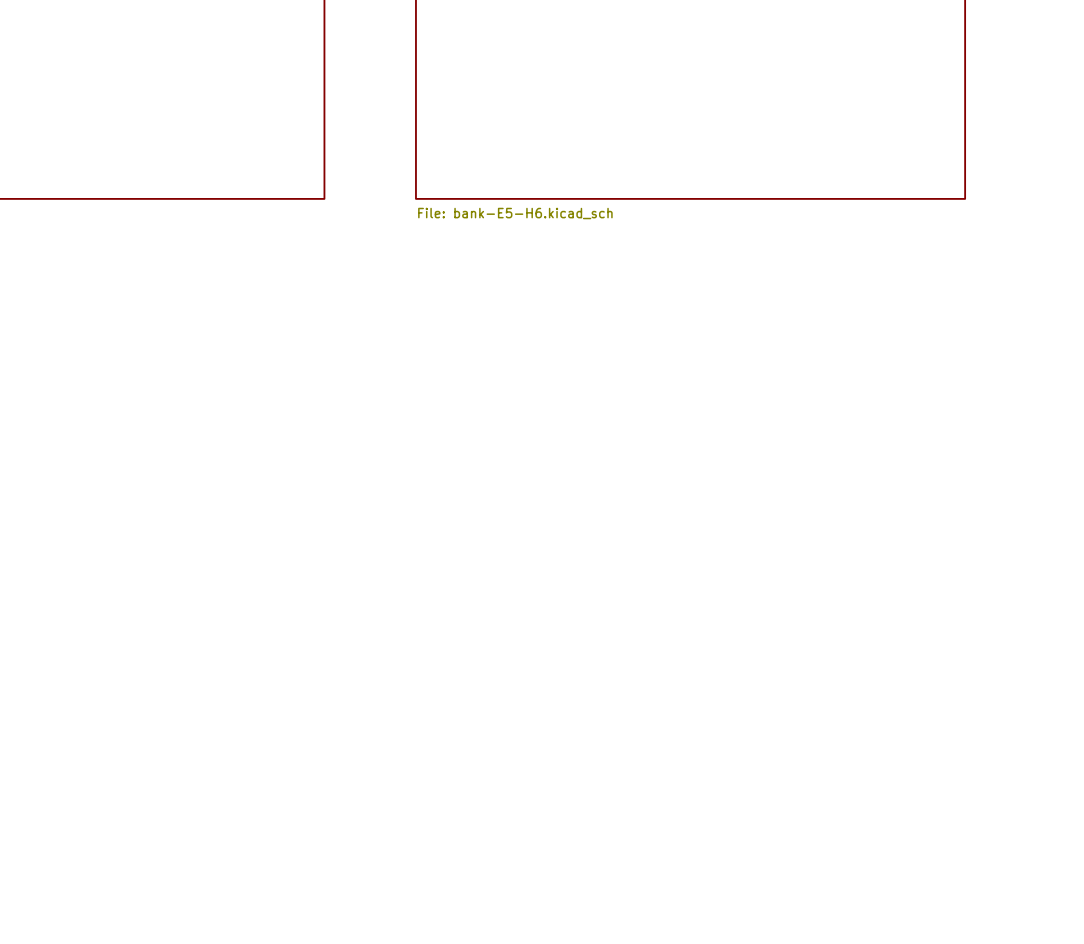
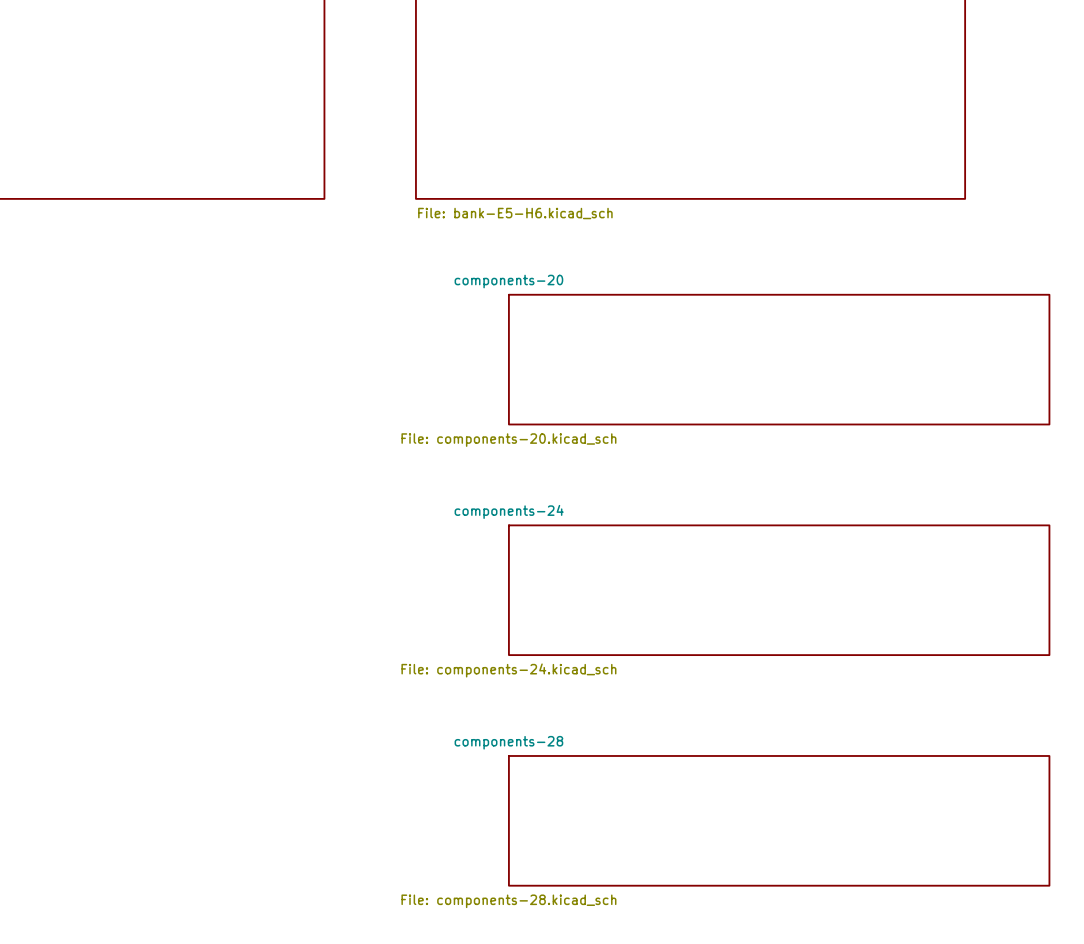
sheet components-20: none -> File: components-20.kicad_sch (779, 359)
sheet components-24: none -> File: components-24.kicad_sch (779, 590)
sheet components-28: none -> File: components-28.kicad_sch (779, 820)

